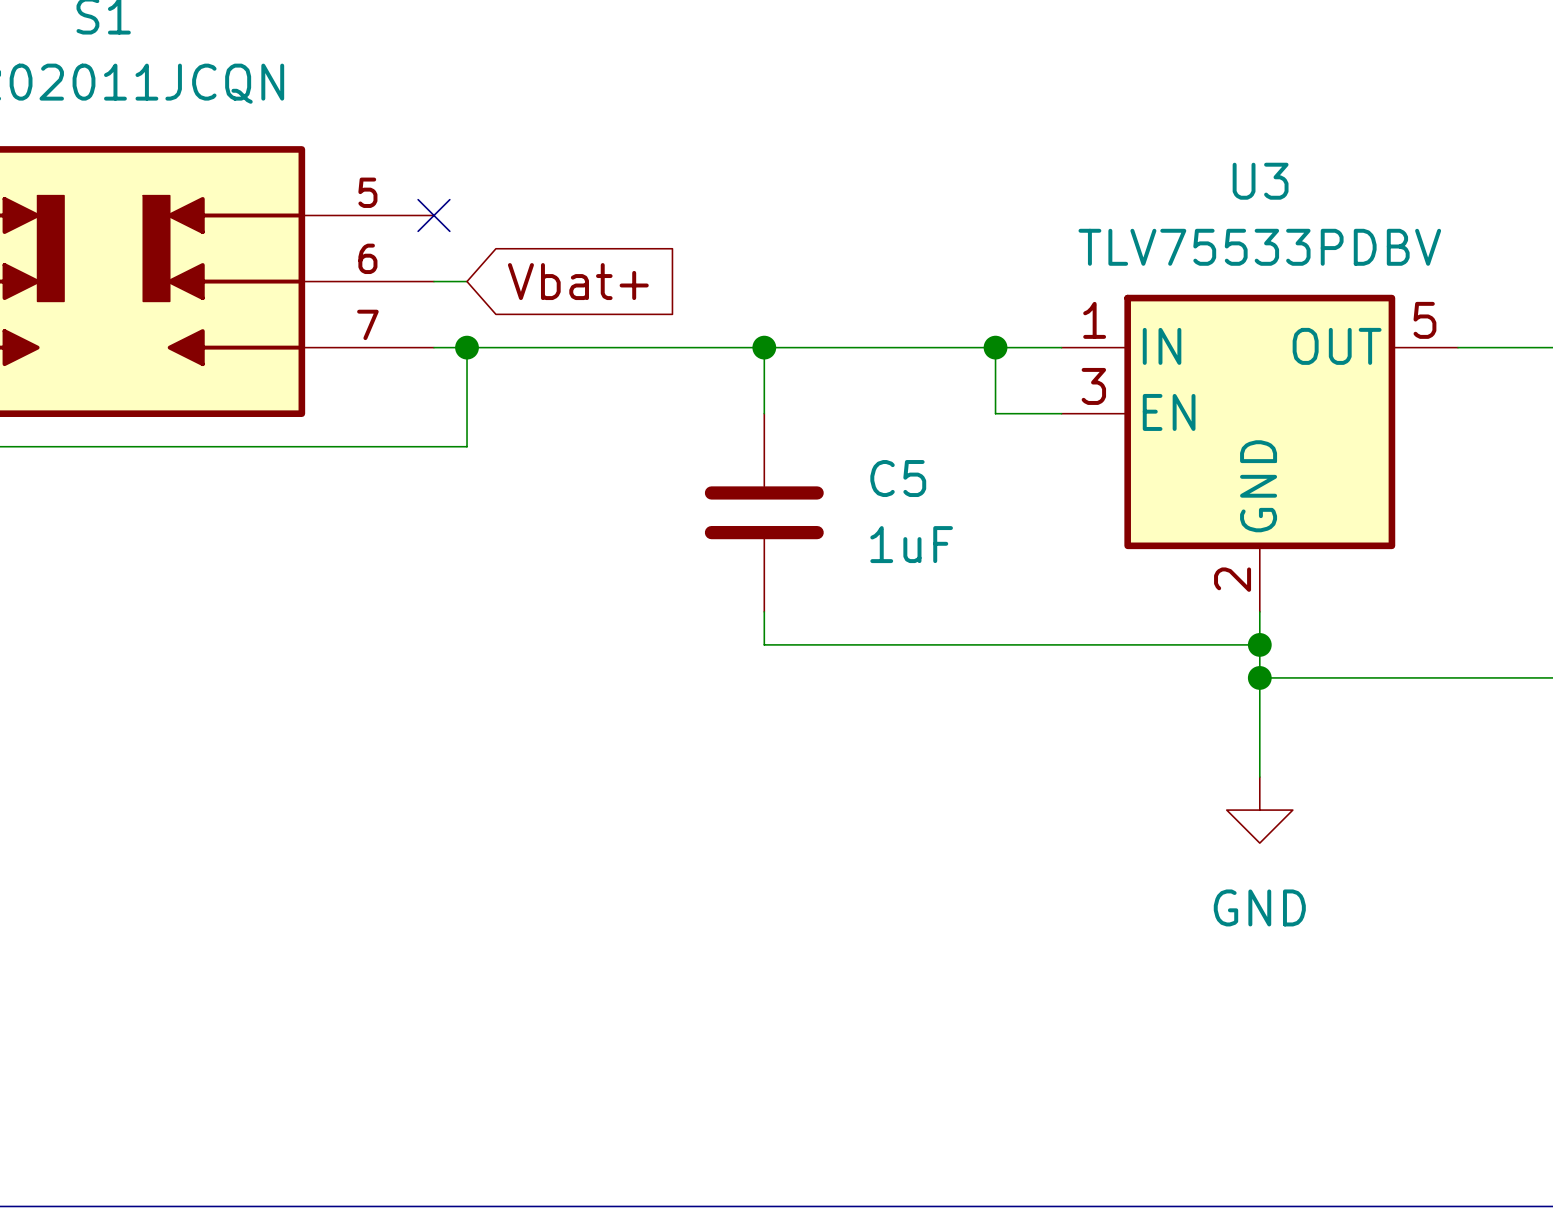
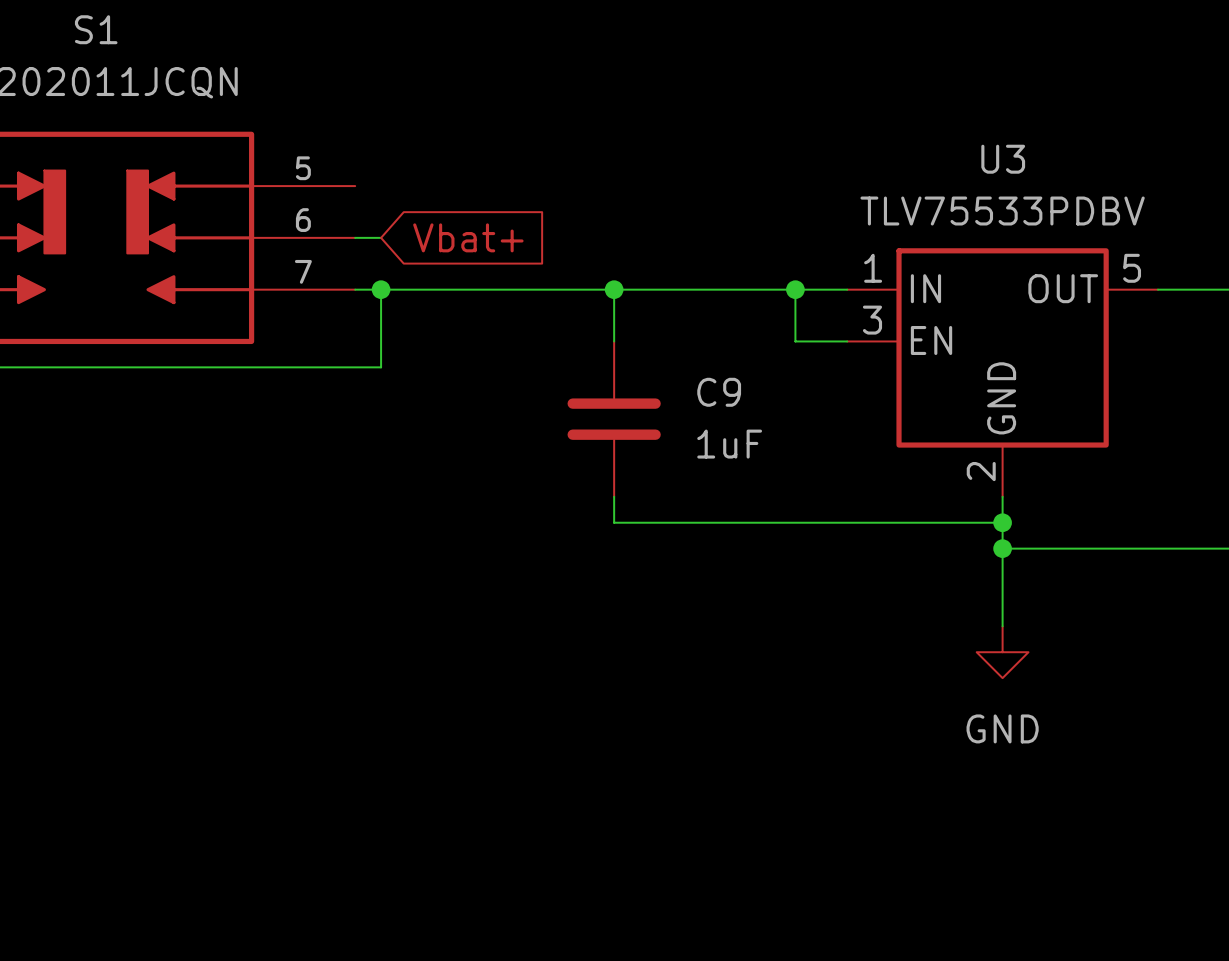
no-connect mark: (433, 215) -> none
C5 name: C5 (898, 478) -> C9 (719, 392)

